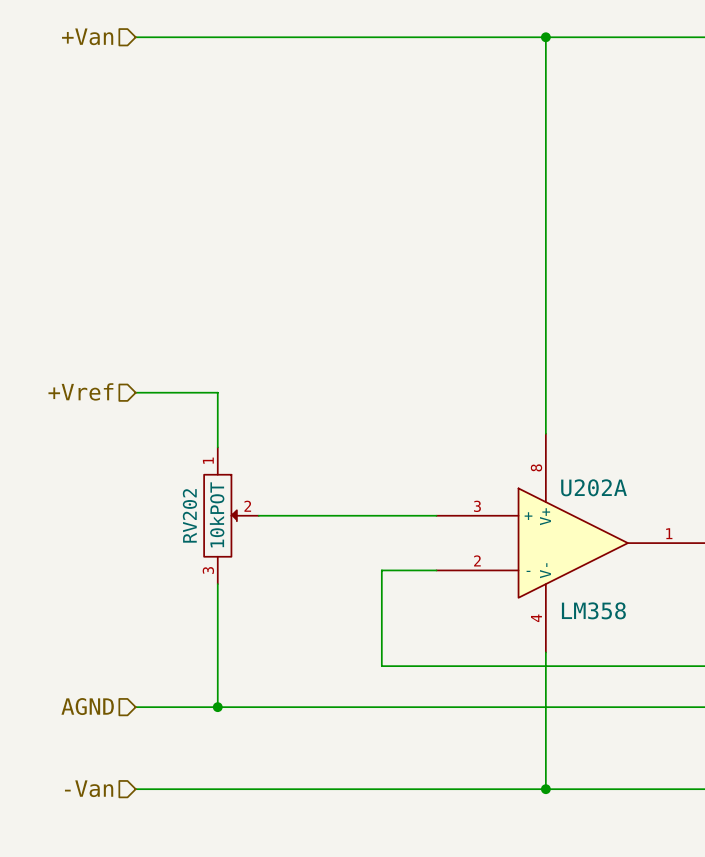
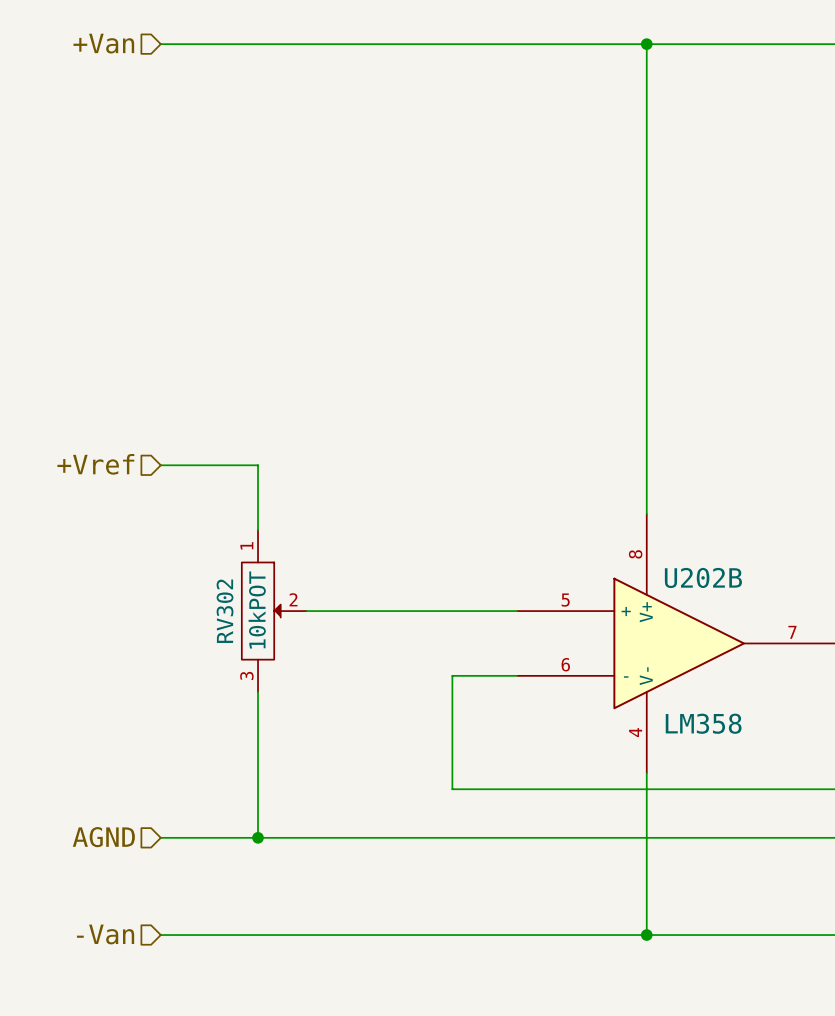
U202A name: U202A (594, 487) -> U202B (703, 577)
U202A pin number: 3 (477, 506) -> 5 (565, 600)
RV202 name: RV202 (189, 515) -> RV302 (225, 611)
U202A pin number: 1 (669, 533) -> 7 (792, 632)
U202A pin number: 2 (477, 560) -> 6 (565, 664)

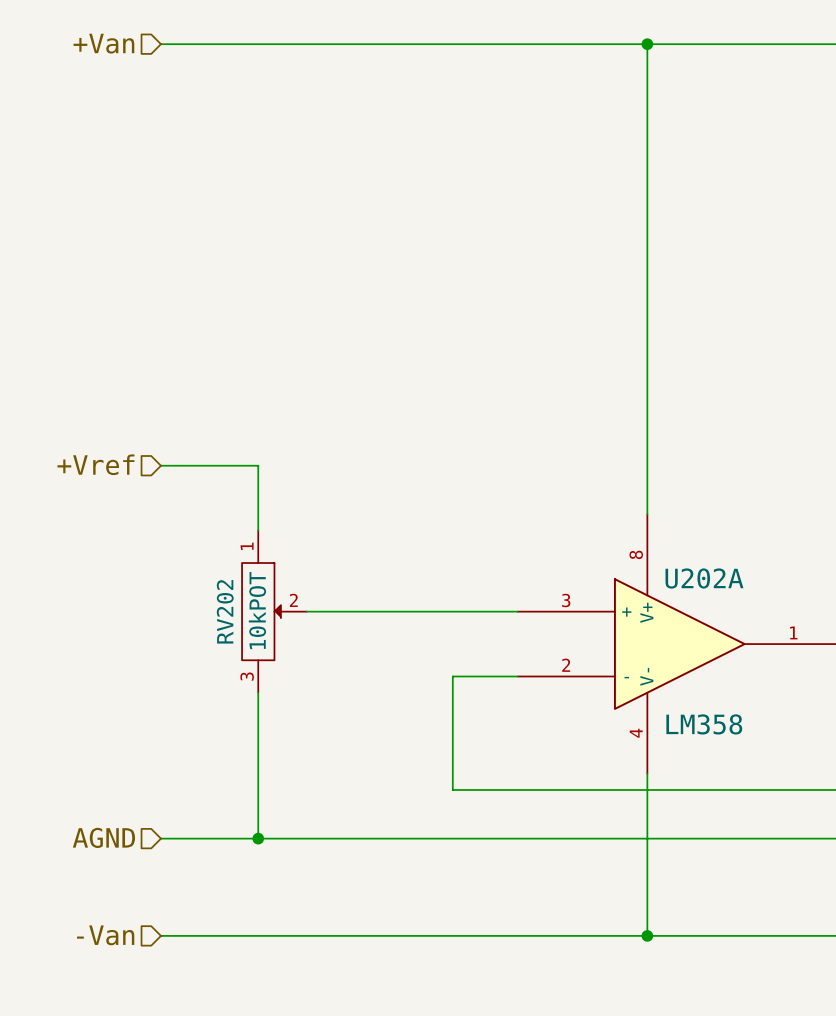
U202B name: U202B (703, 577) -> U202A (704, 578)
U202B pin number: 5 (565, 600) -> 3 (566, 600)
RV302 name: RV302 (225, 611) -> RV202 (225, 611)
U202B pin number: 7 (792, 632) -> 1 (793, 632)
U202B pin number: 6 (565, 664) -> 2 (566, 665)

